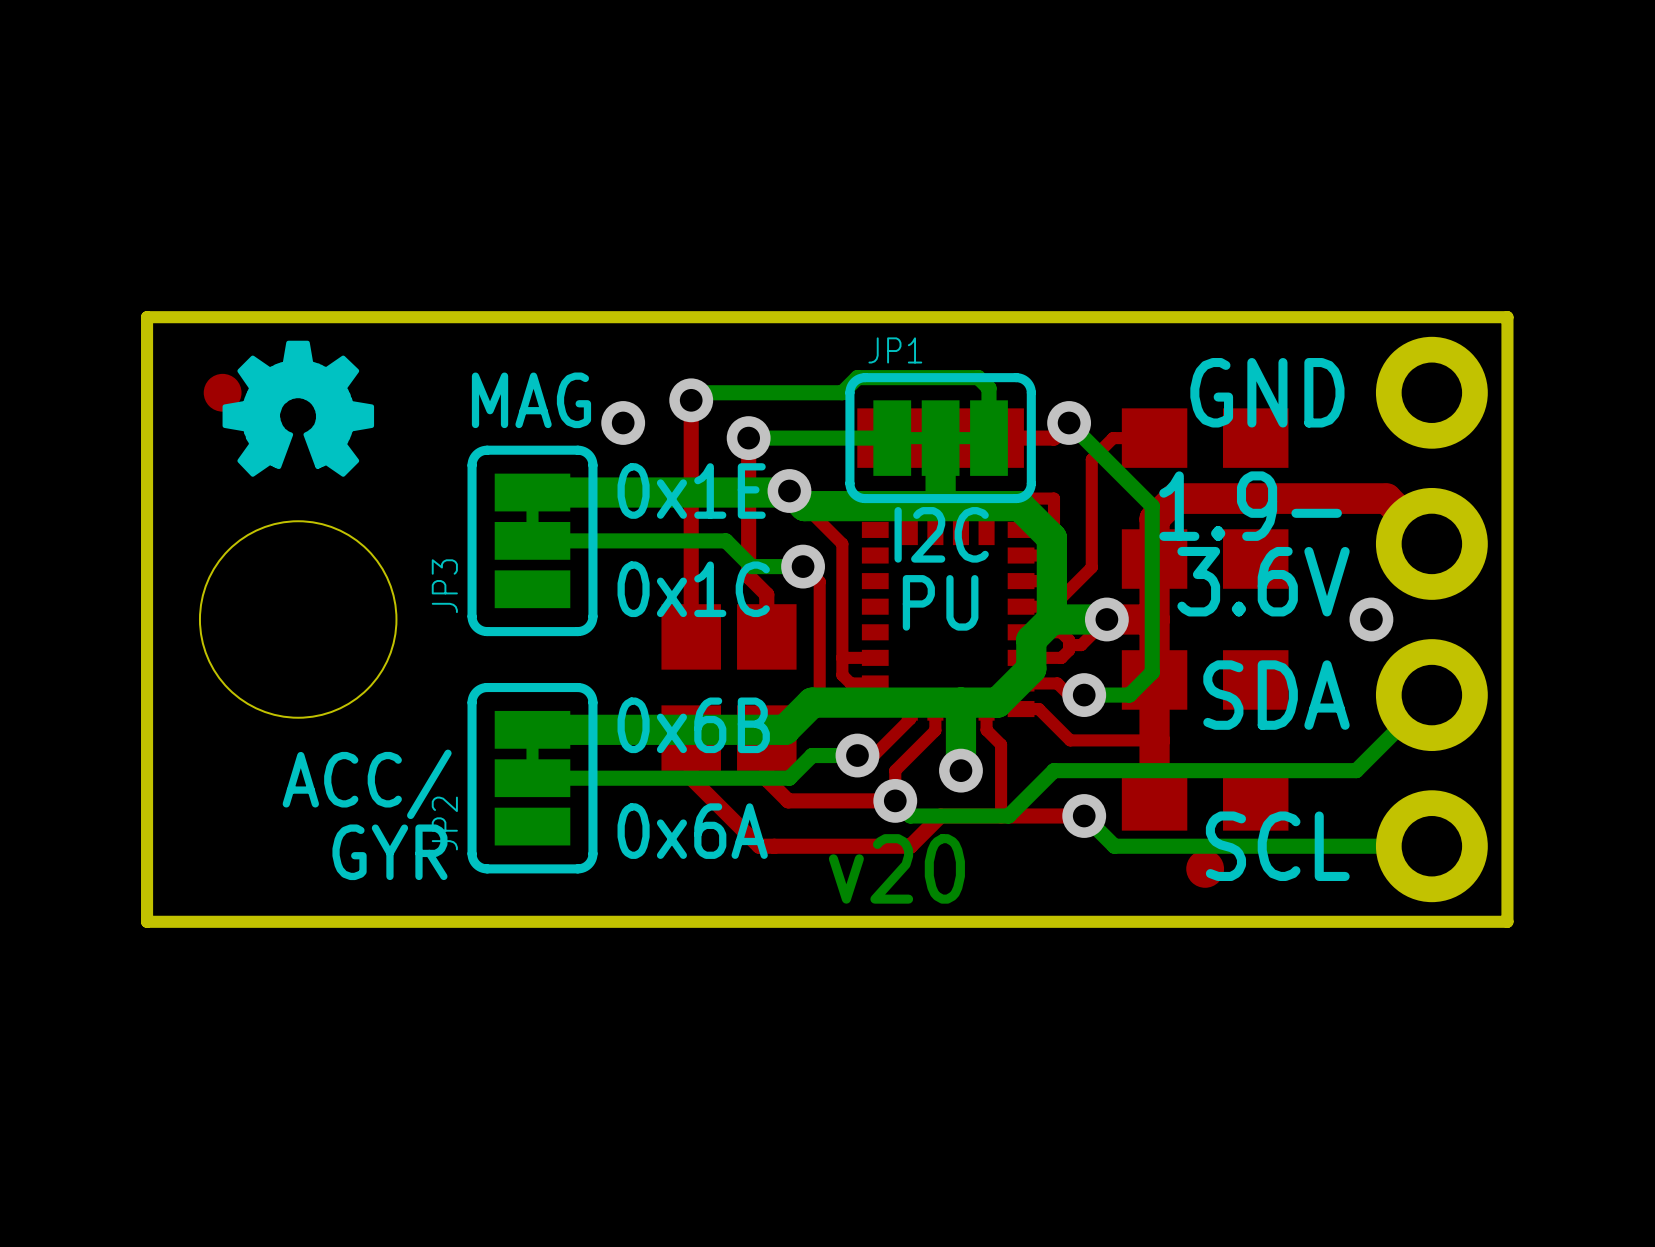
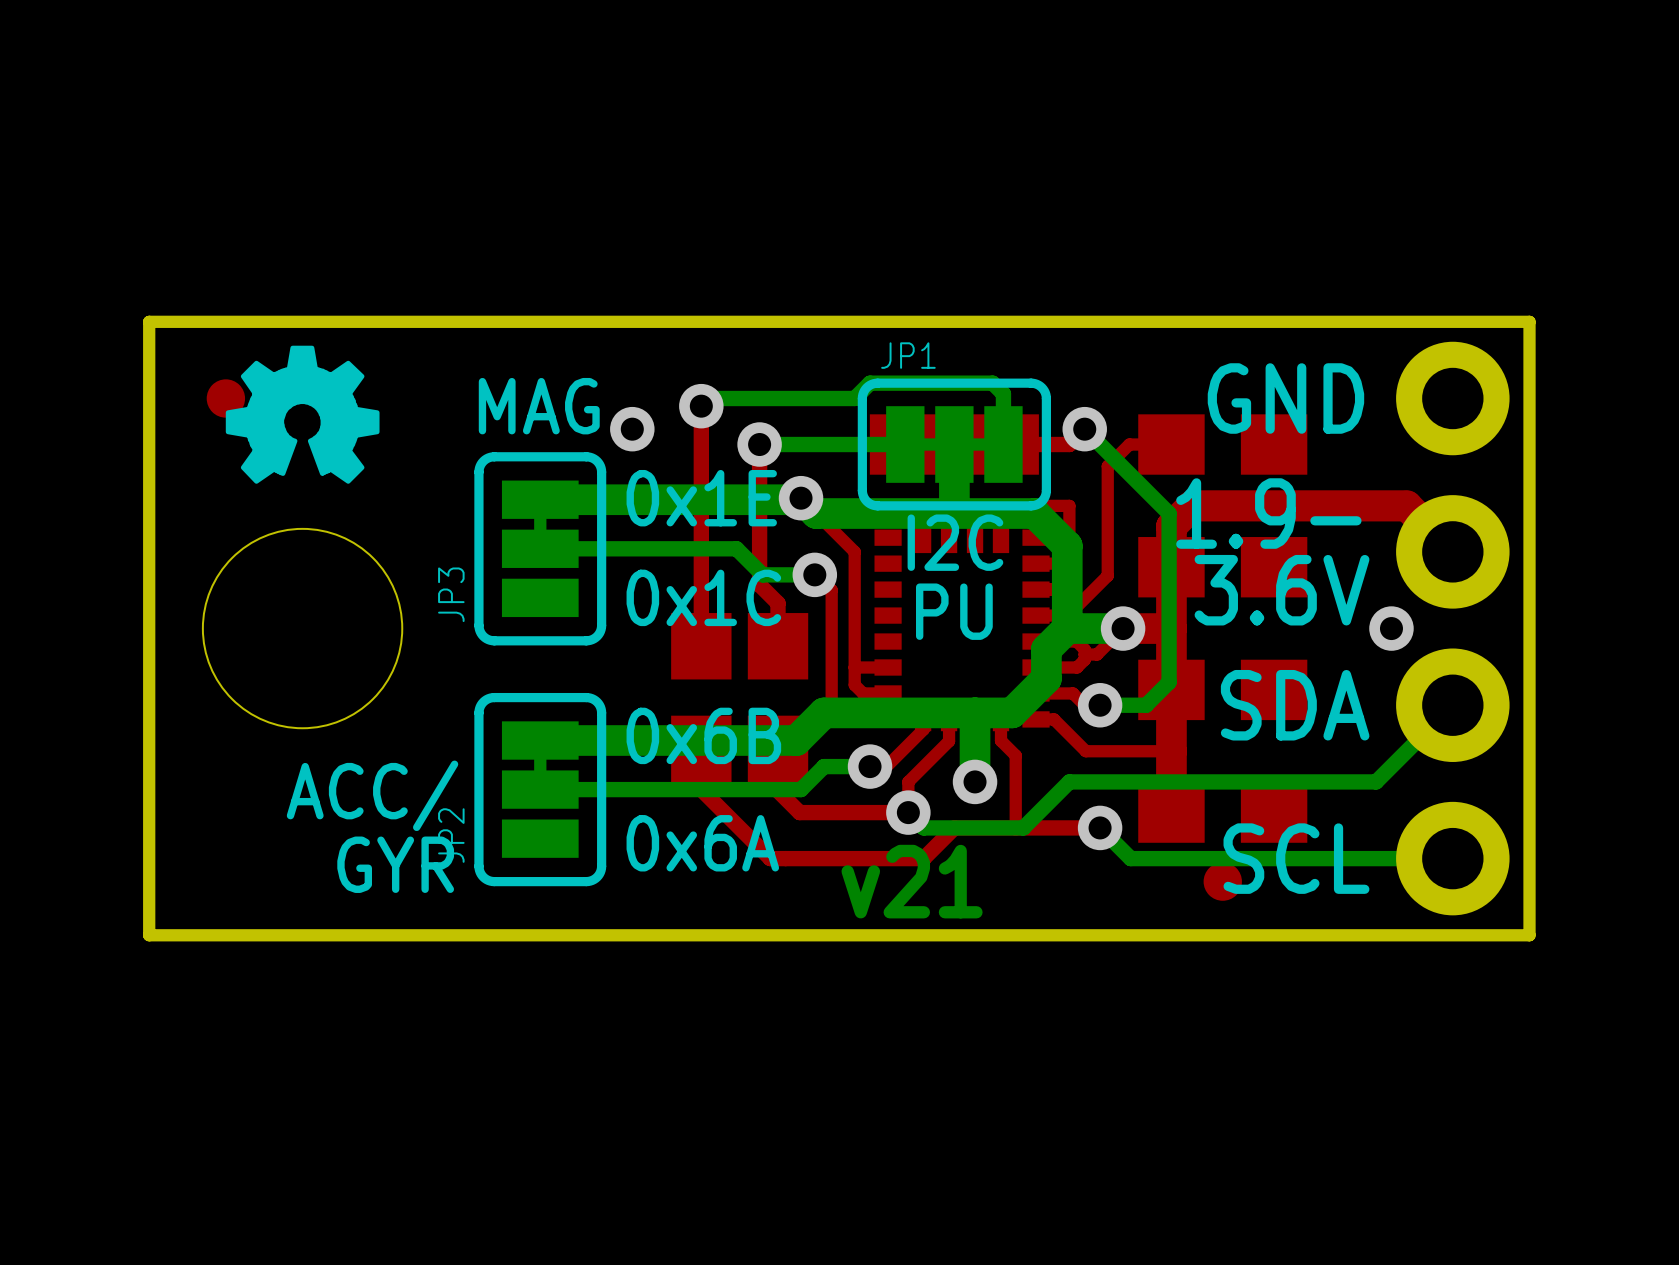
text: v20 (896, 868) -> v21 (912, 881)

